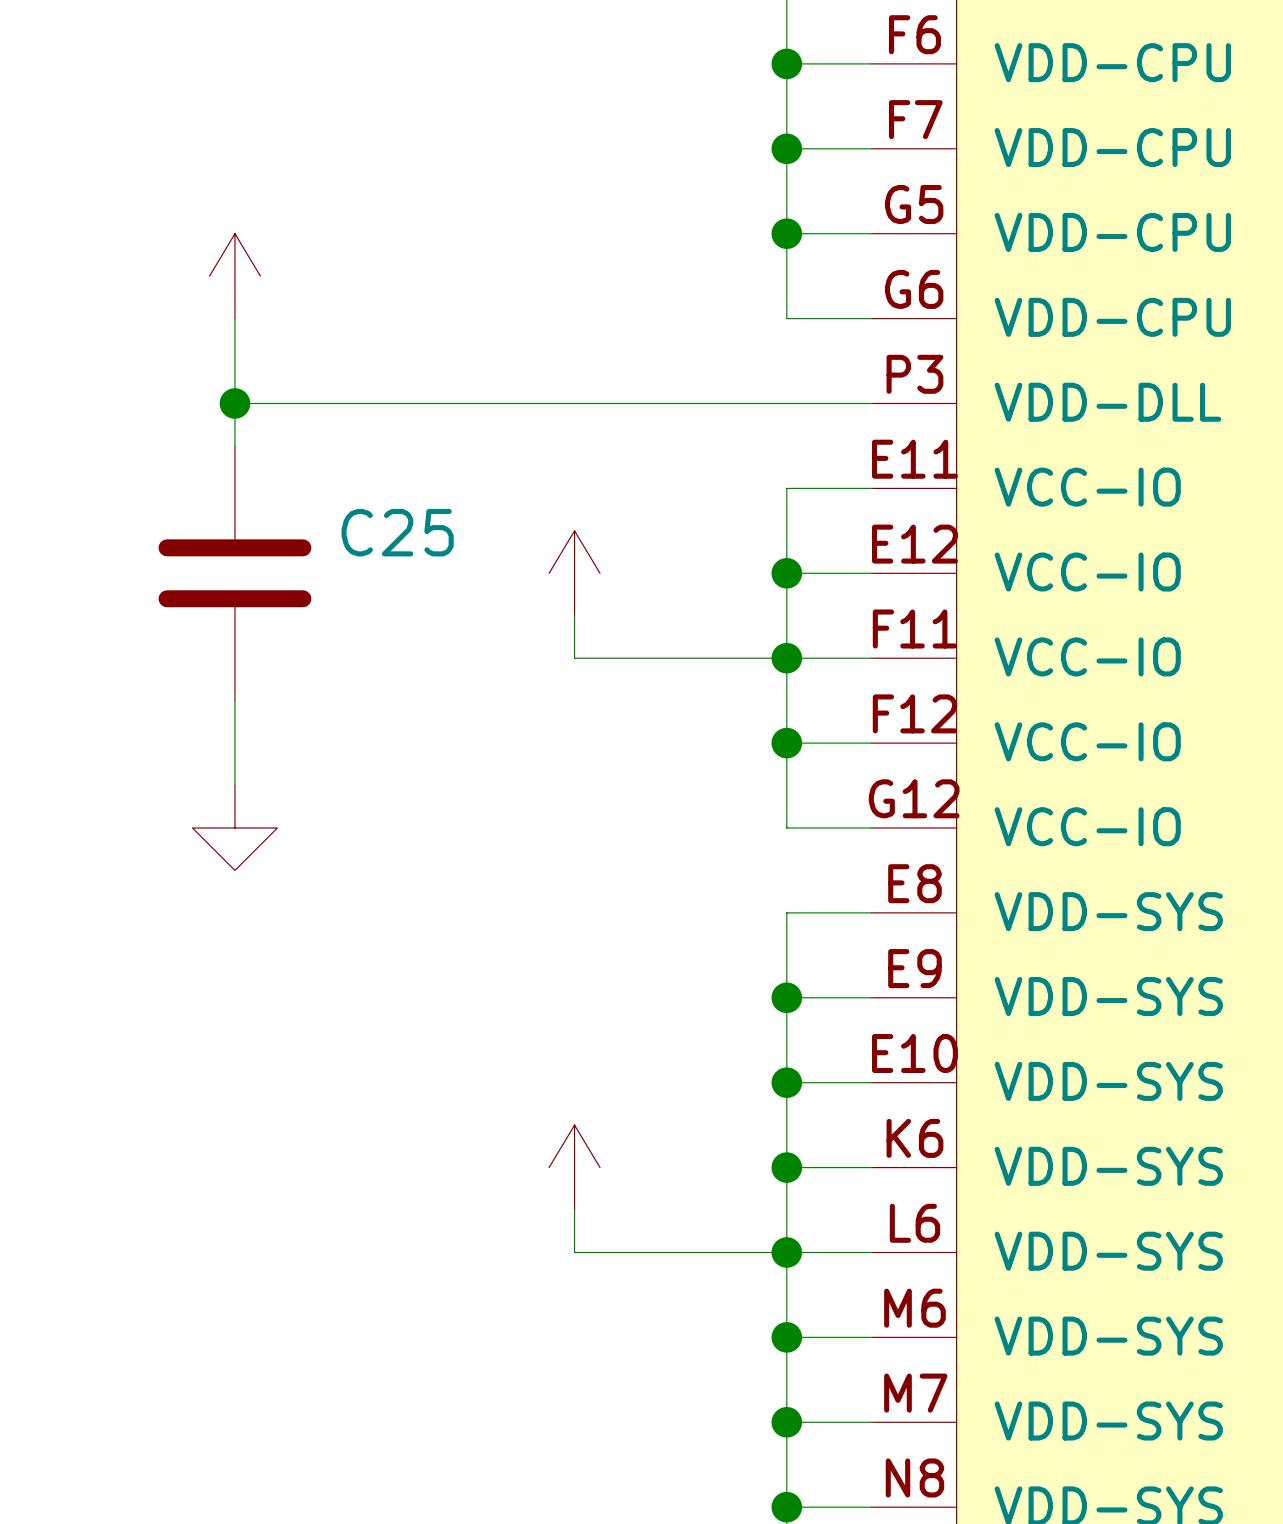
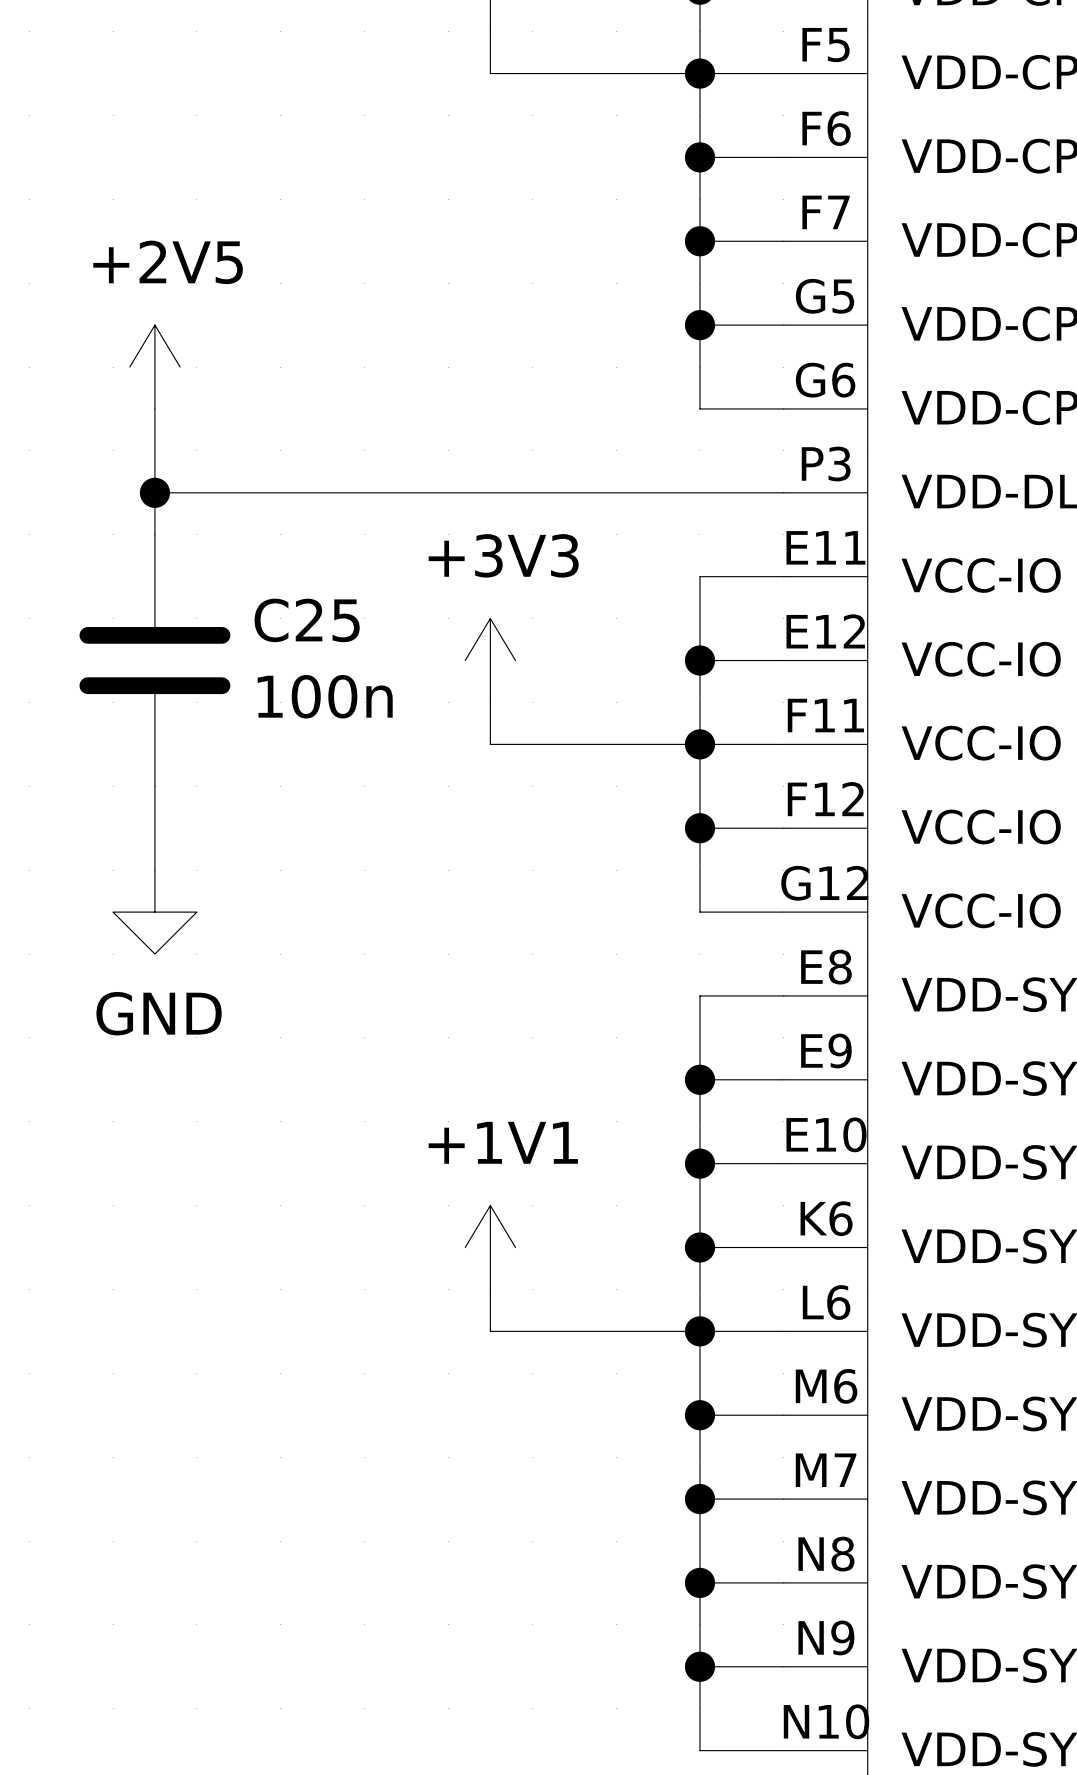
power symbol text: none -> +2V5 (168, 262)
power symbol text: none -> +3V3 (503, 555)
C25 value: none -> 100n (325, 696)
power symbol text: none -> GND (159, 1013)
power symbol text: none -> +1V1 (503, 1142)

